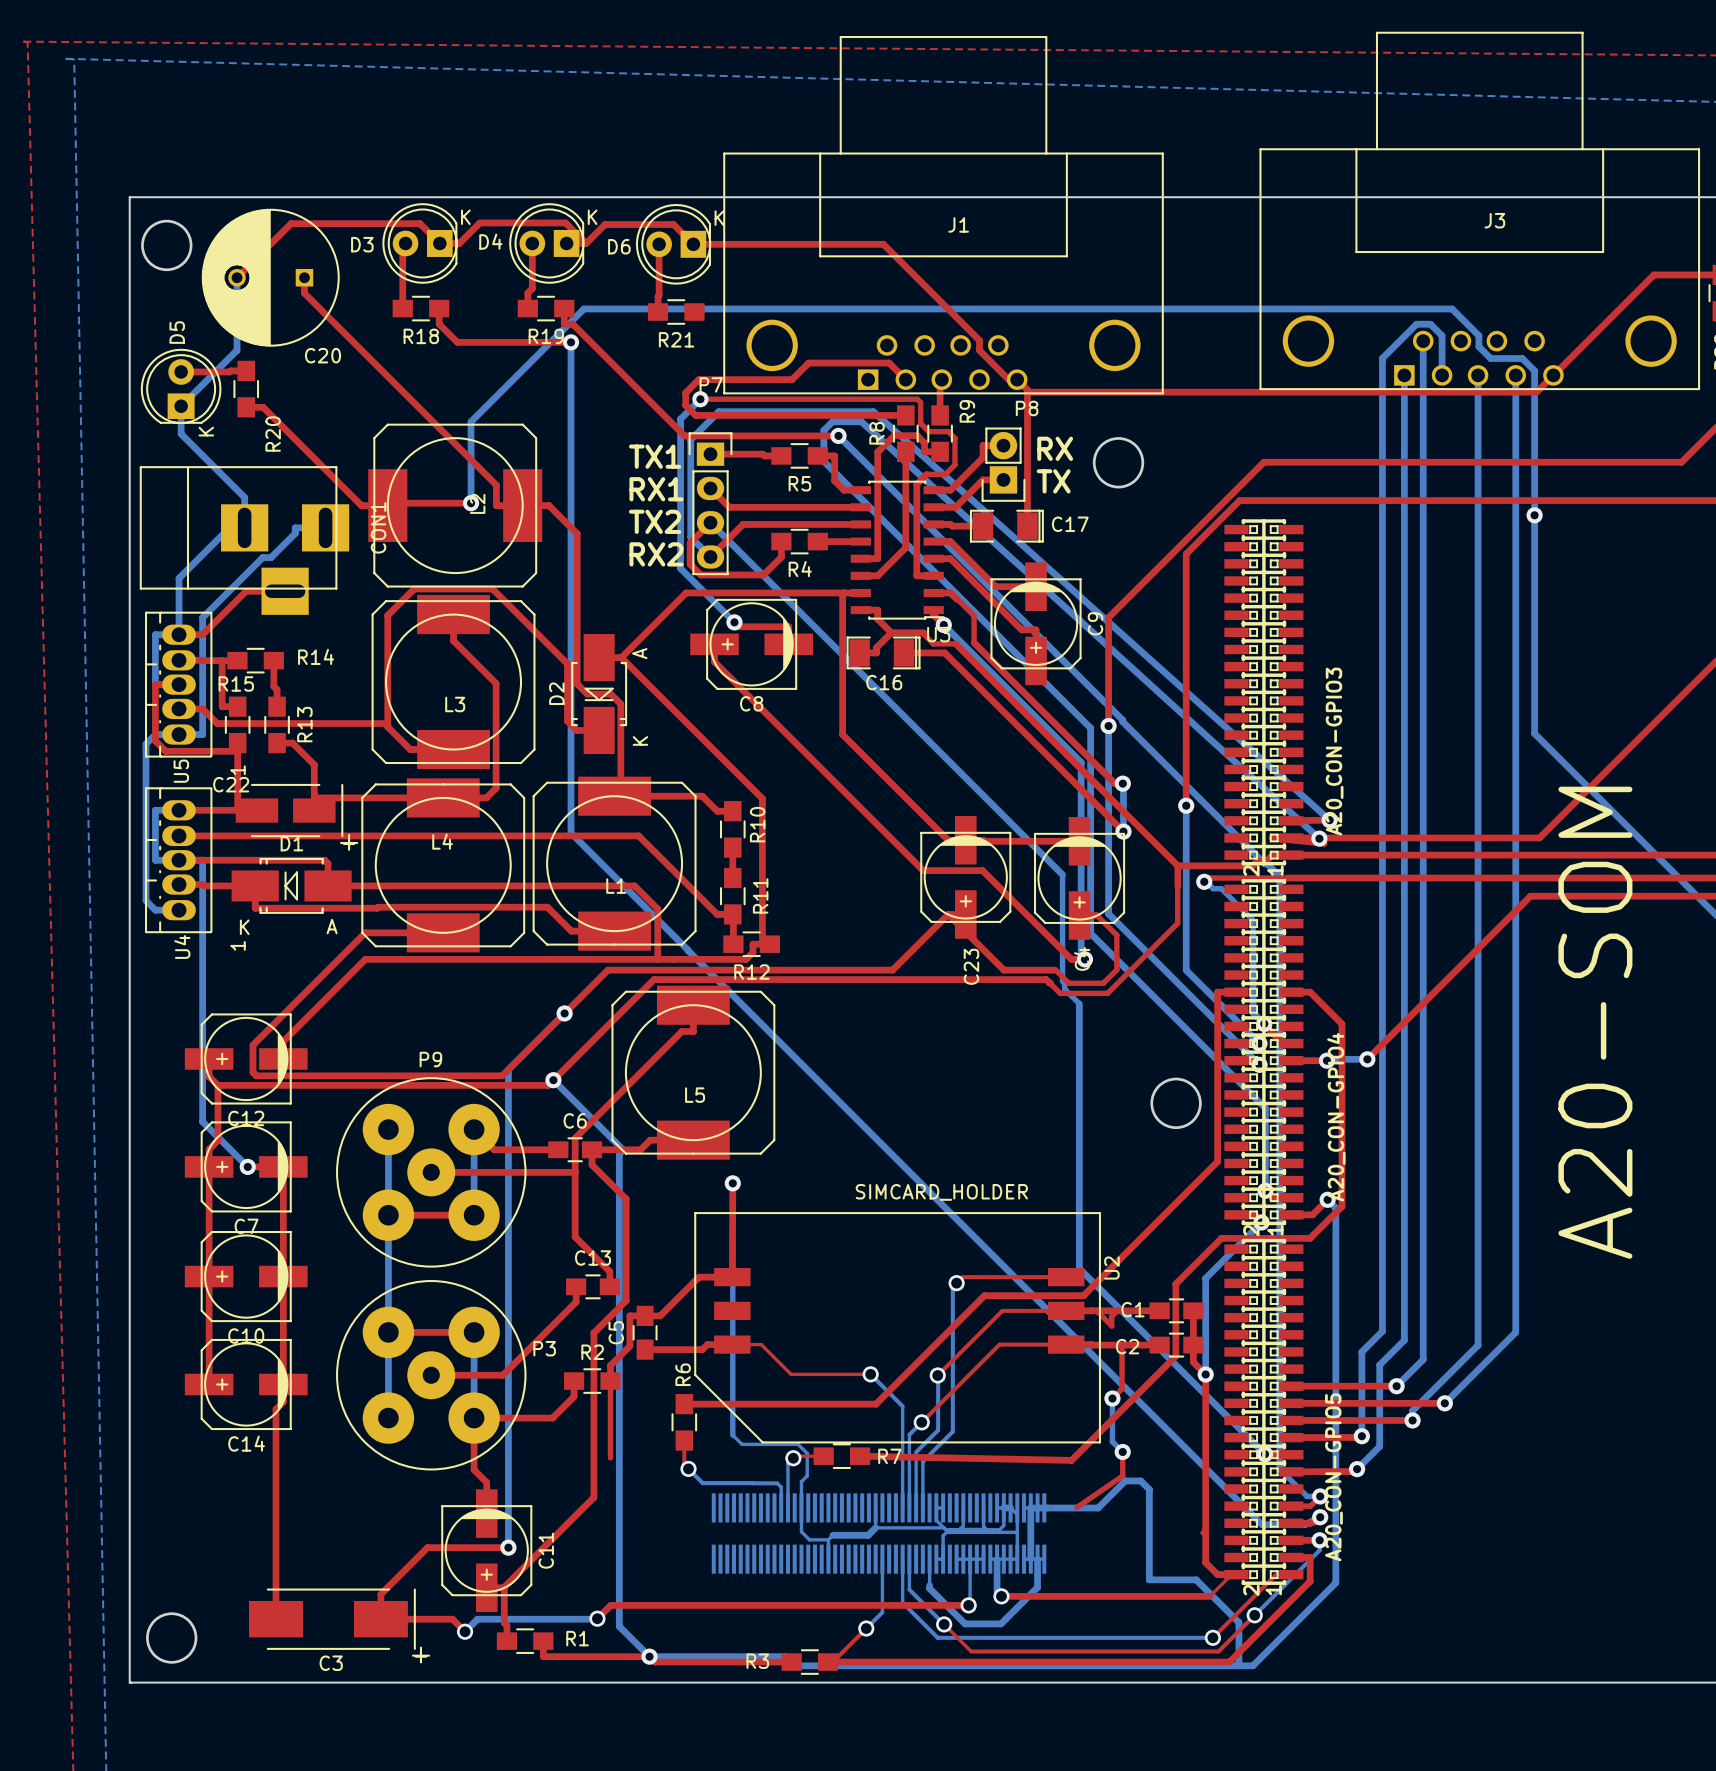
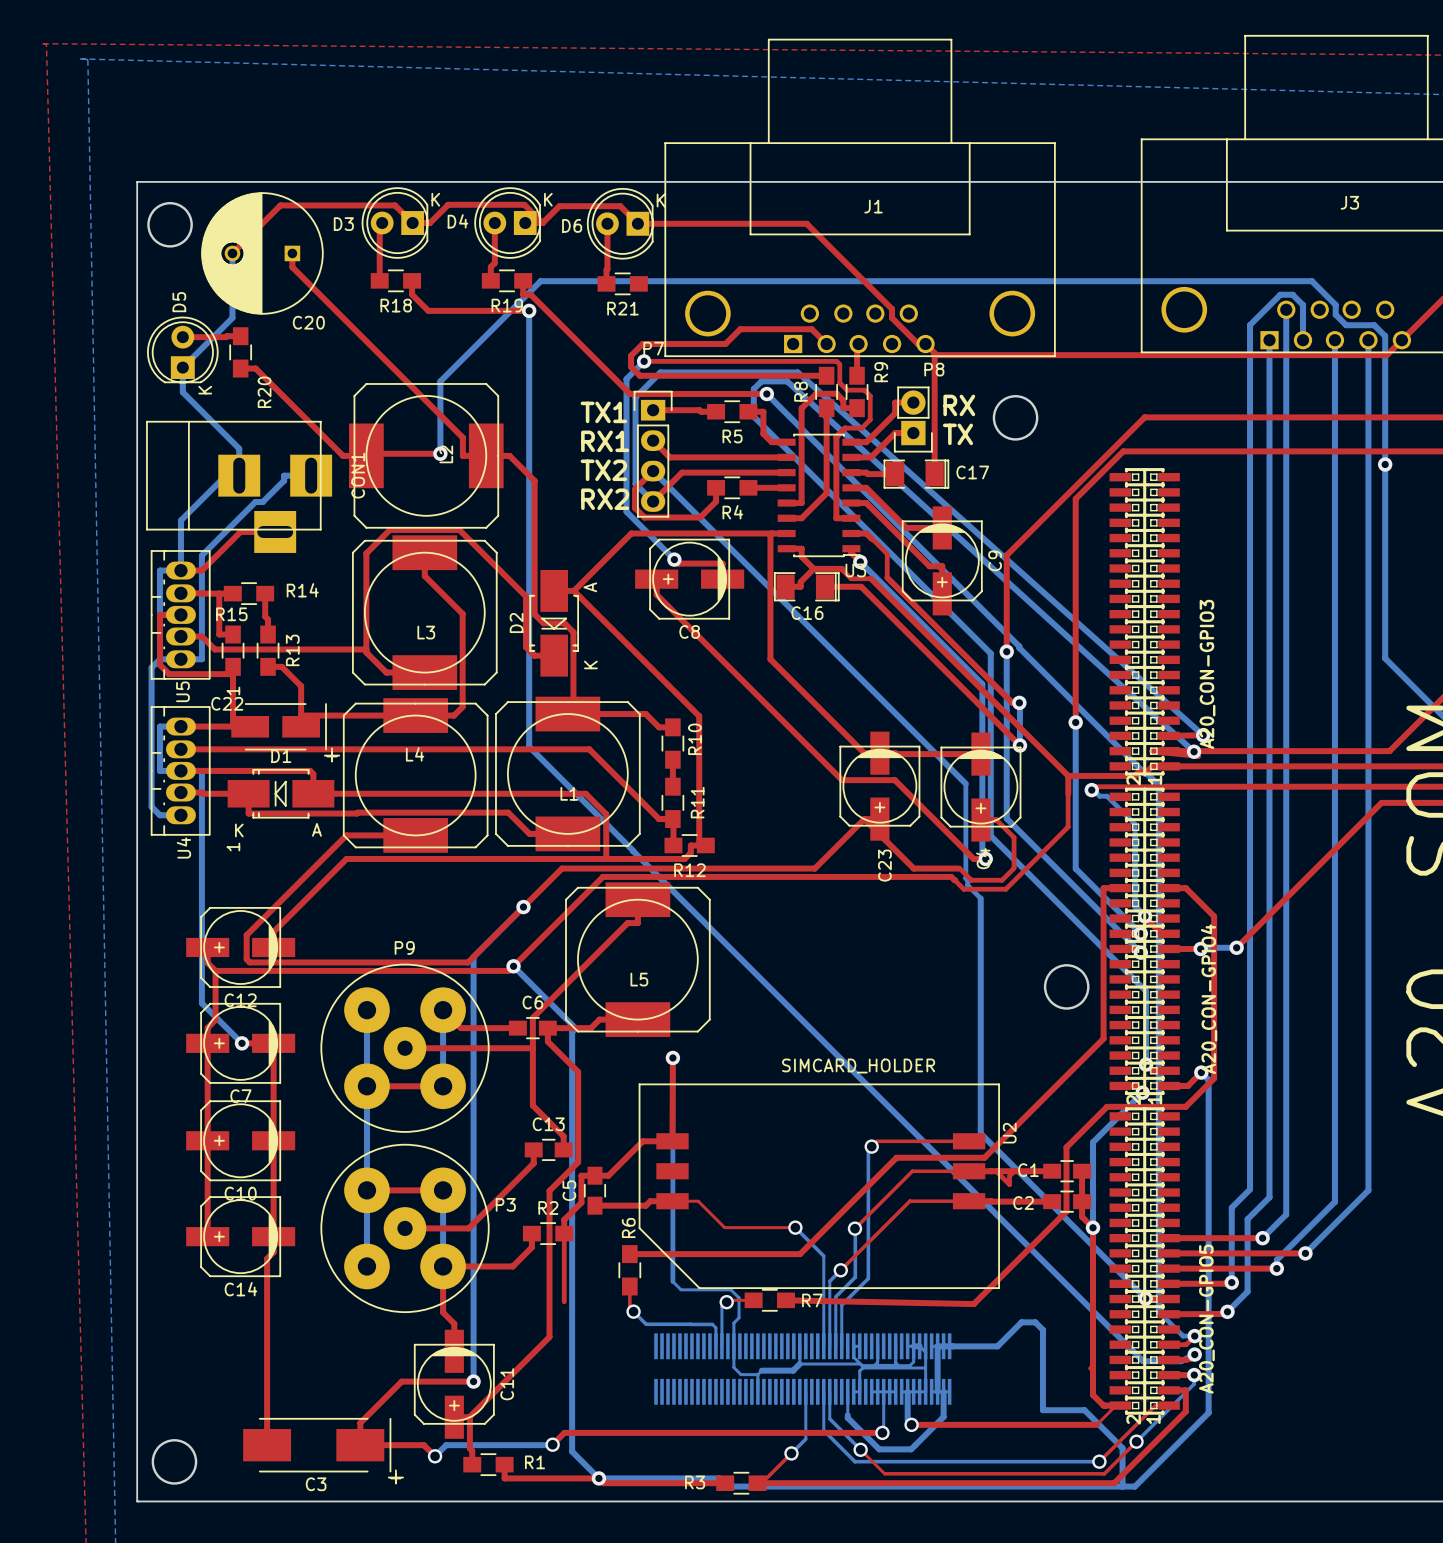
top track: (1122, 1345) (1122, 1388) (1112, 1398) -> none
bottom track: (1112, 1398) (1112, 1441) (1122, 1452) -> none
via: (1112, 1398) -> none
top track: (1122, 1452) (1122, 1475) (1076, 1507) -> none
via: (1122, 1452) -> none

